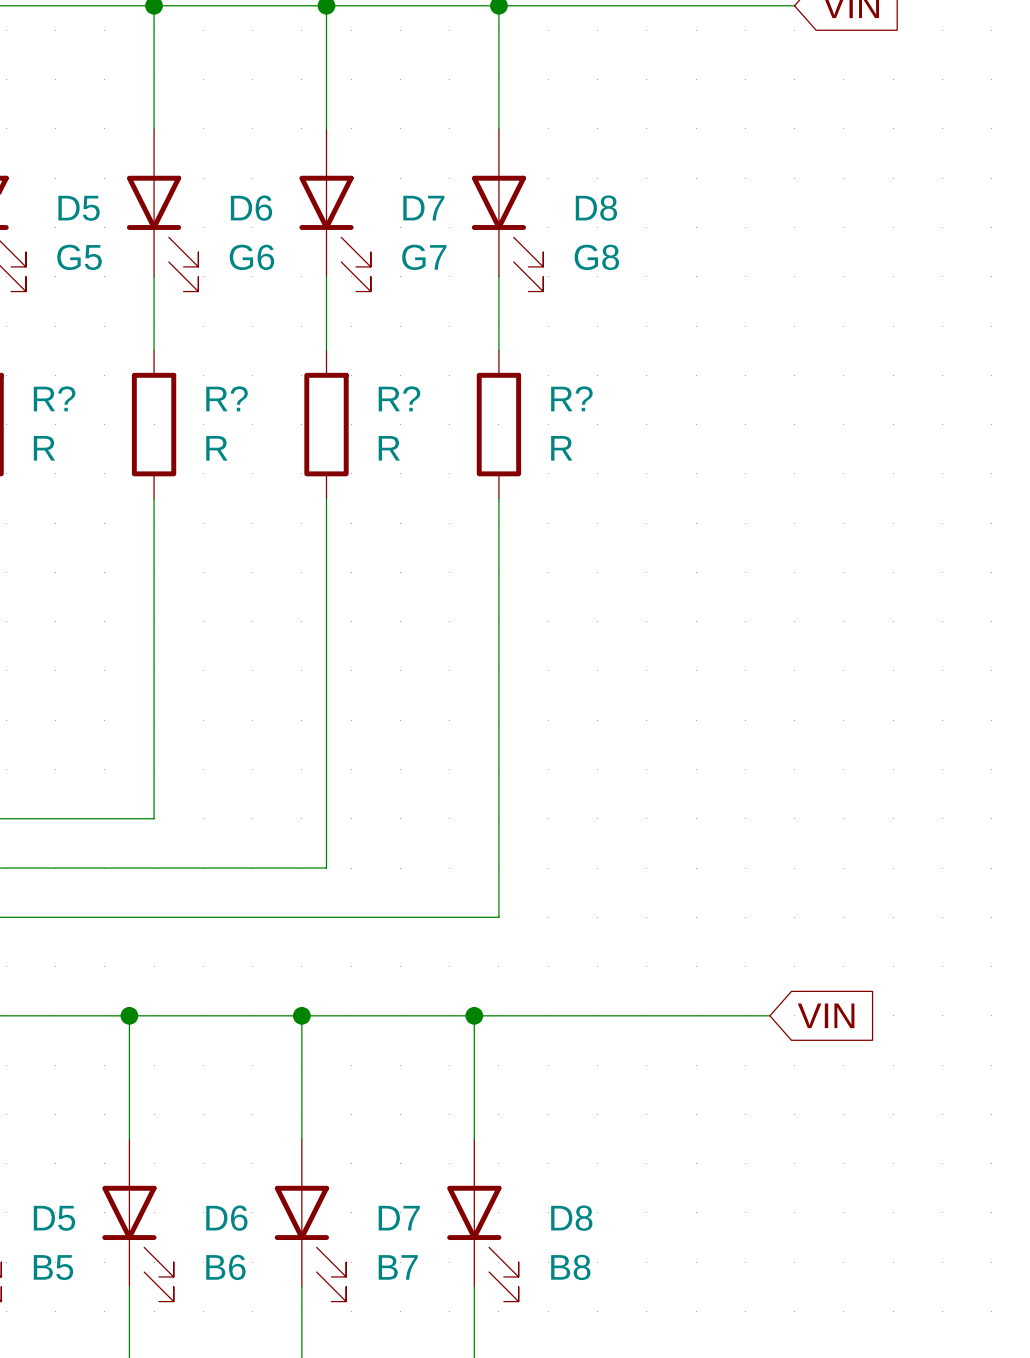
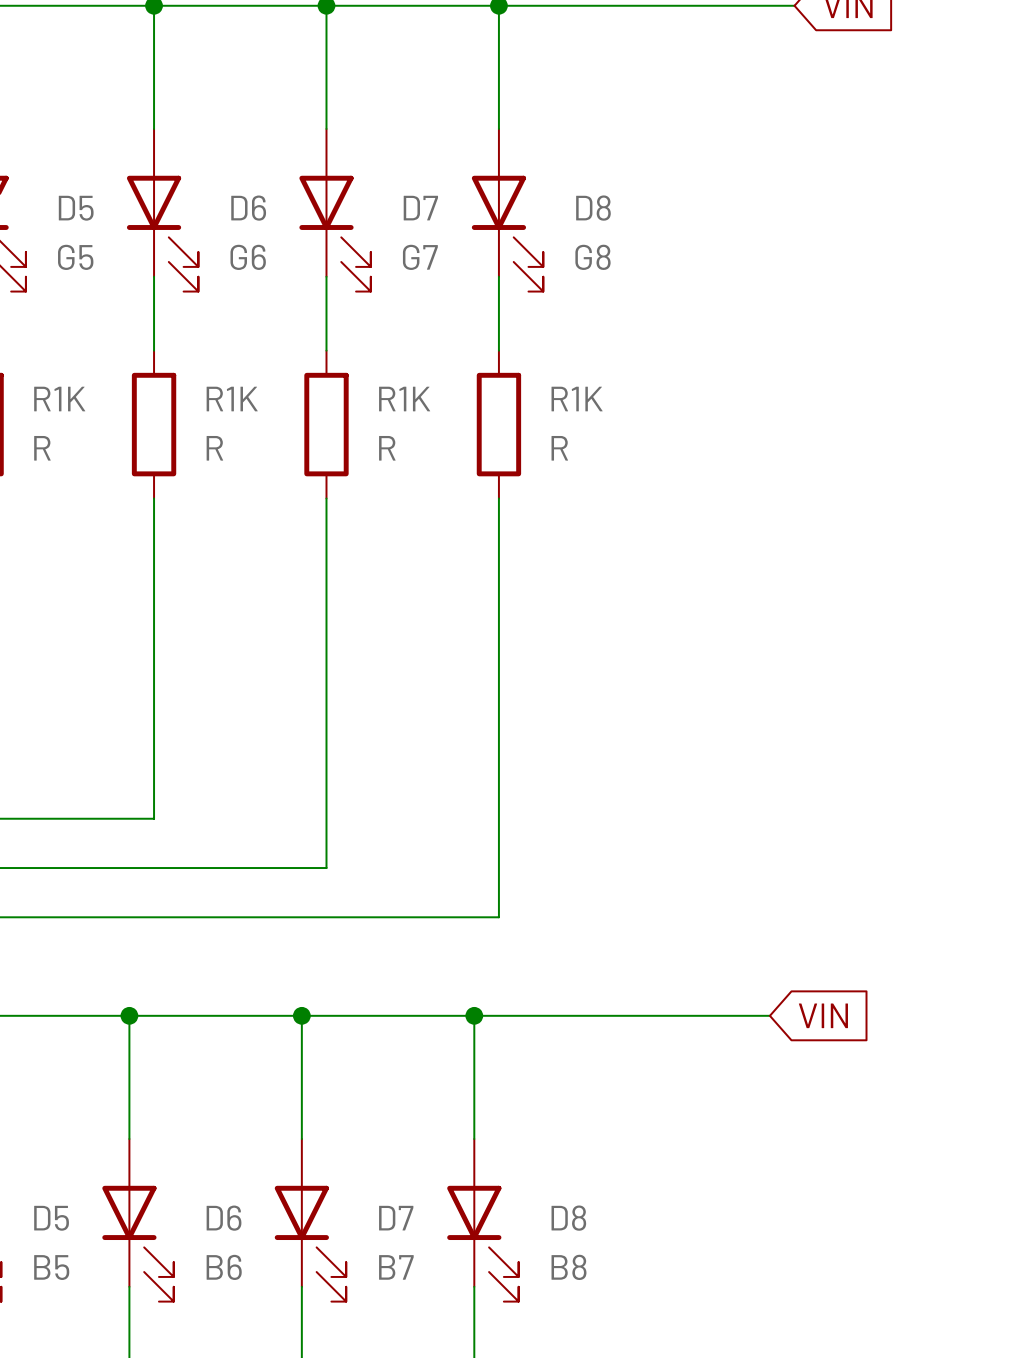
R? name: R? (54, 398) -> R1K (59, 399)
R? name: R? (227, 398) -> R1K (232, 399)
R? name: R? (399, 398) -> R1K (404, 399)
R? name: R? (571, 398) -> R1K (577, 399)

